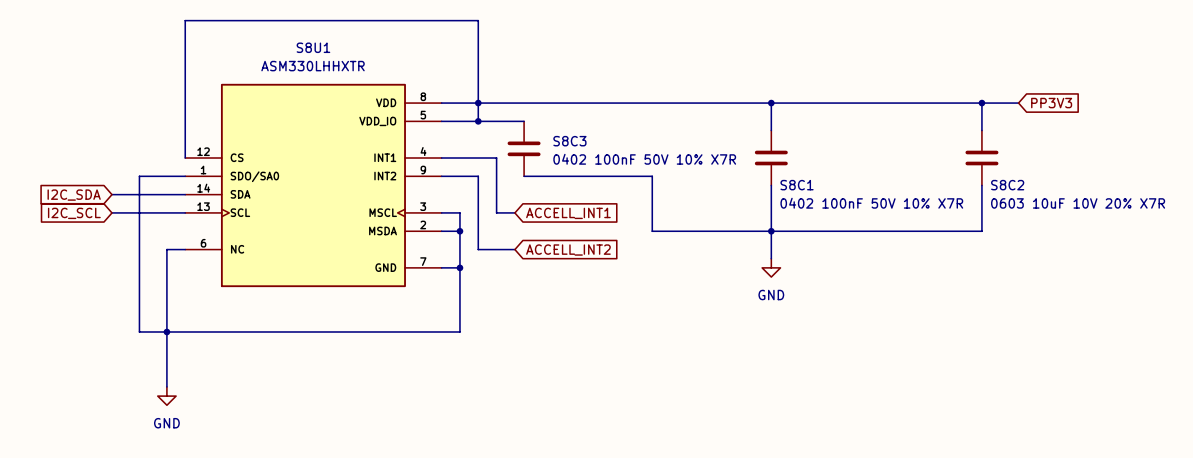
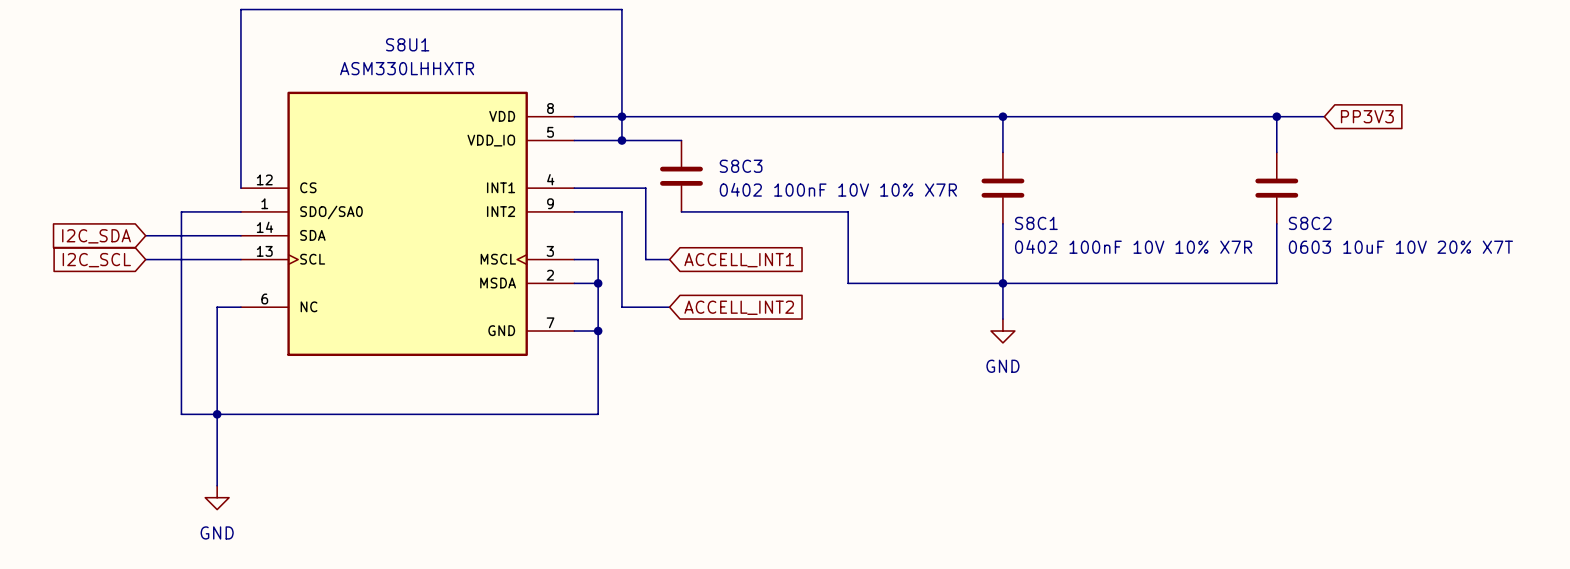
S8C3 value: 0402 100nF 50V 10% X7R (644, 159) -> 0402 100nF 10V 10% X7R (838, 189)
S8C1 value: 0402 100nF 50V 10% X7R (871, 203) -> 0402 100nF 10V 10% X7R (1133, 246)
S8C2 value: 0603 10uF 10V 20% X7R (1078, 203) -> 0603 10uF 10V 20% X7T (1400, 247)

